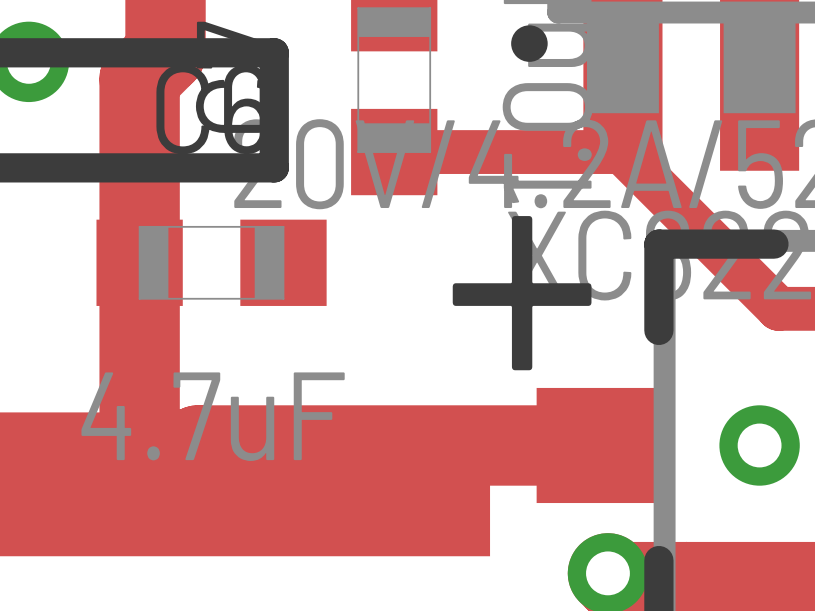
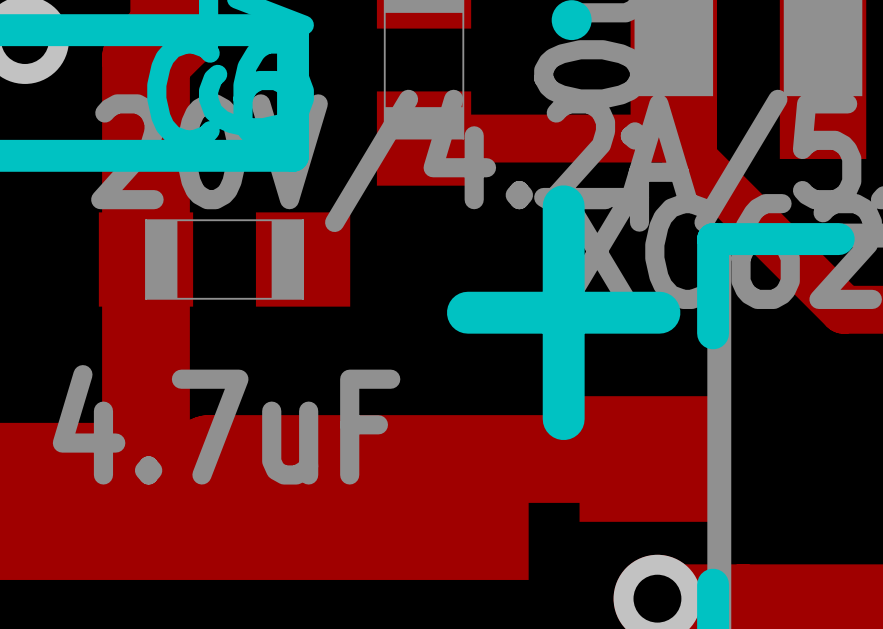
via: (759, 445) -> none

